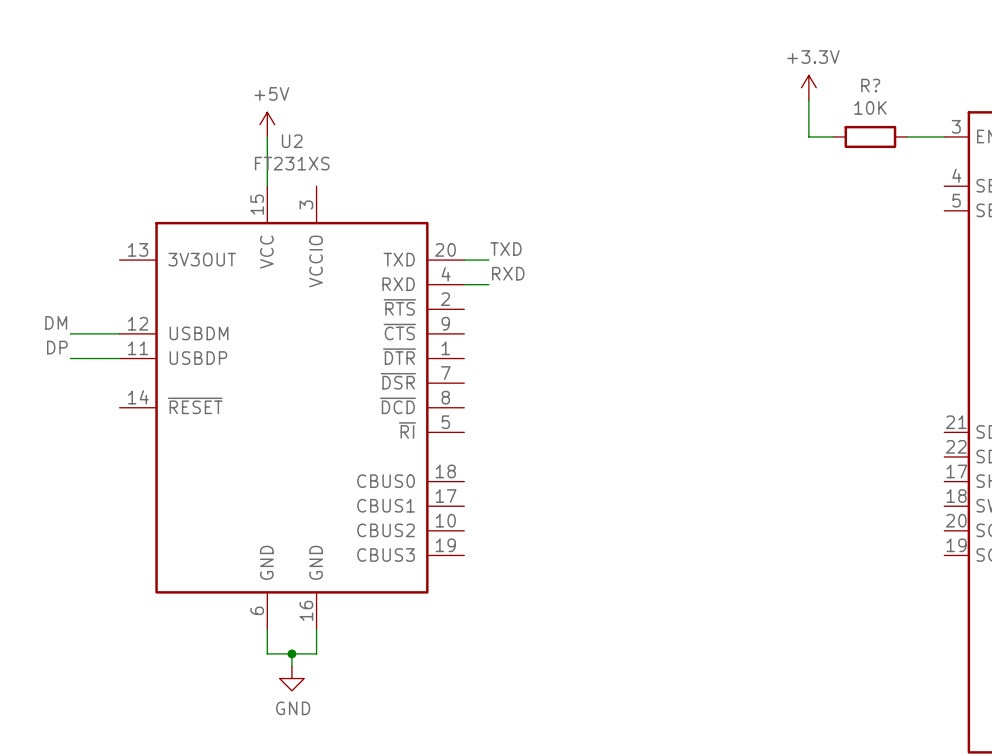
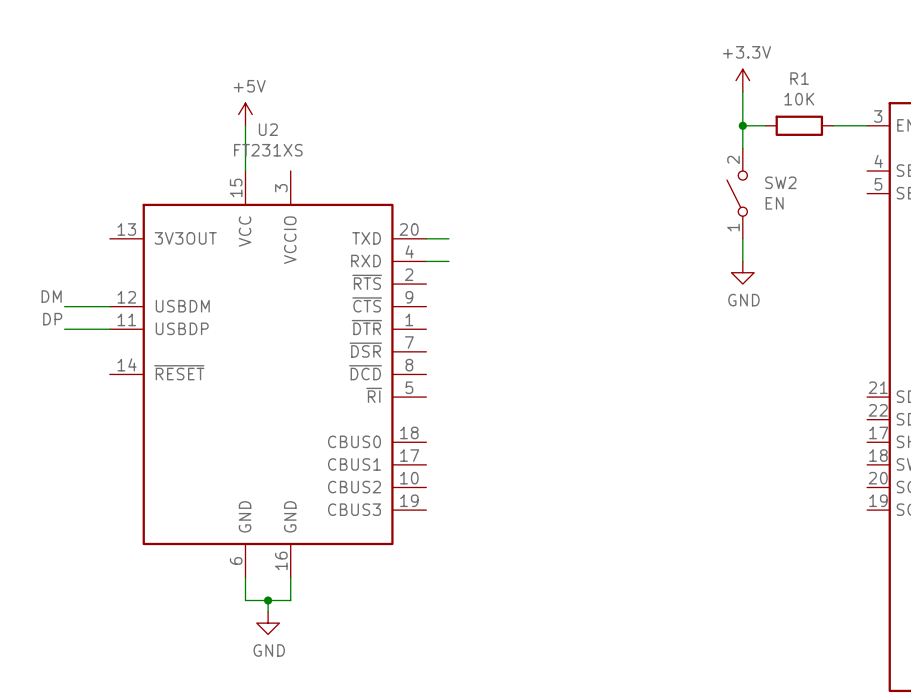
R? name: R? (870, 85) -> R1 (799, 78)
wire: none -> (742, 125) (742, 148)
junction: none -> (742, 125)
SW2: none -> EN (737, 193)
label: TXD (505, 249) -> none
wire: none -> (742, 238) (742, 261)
label: RXD (508, 273) -> none
power symbol: none -> GND (742, 272)

